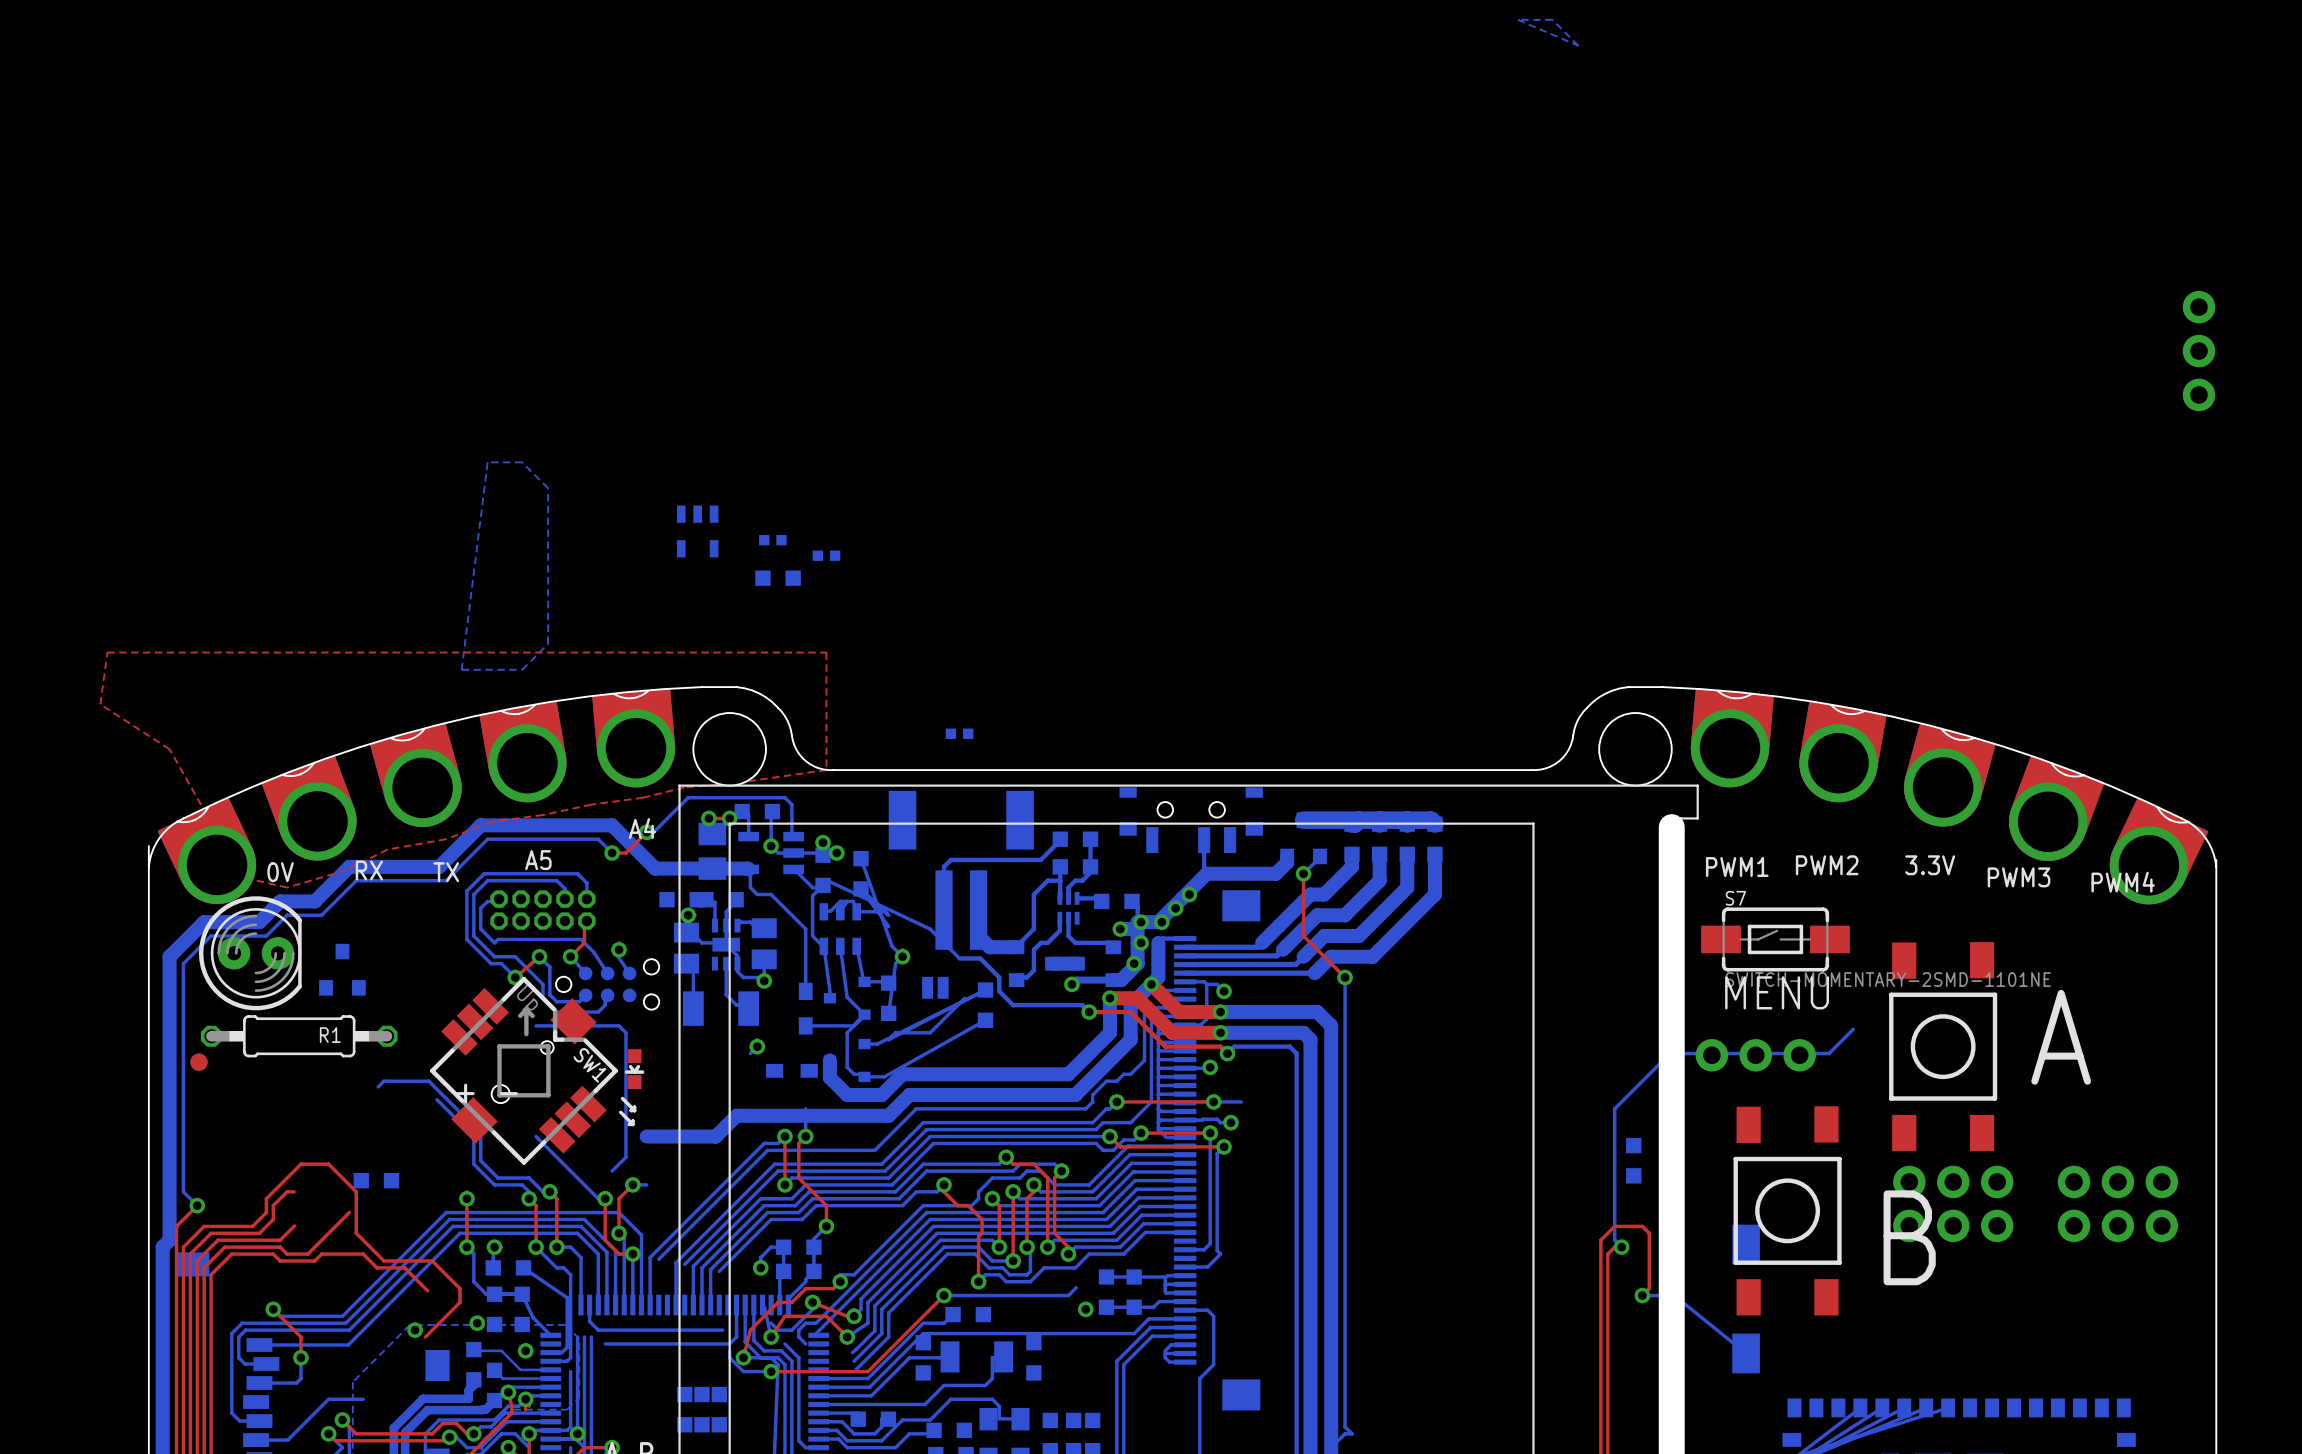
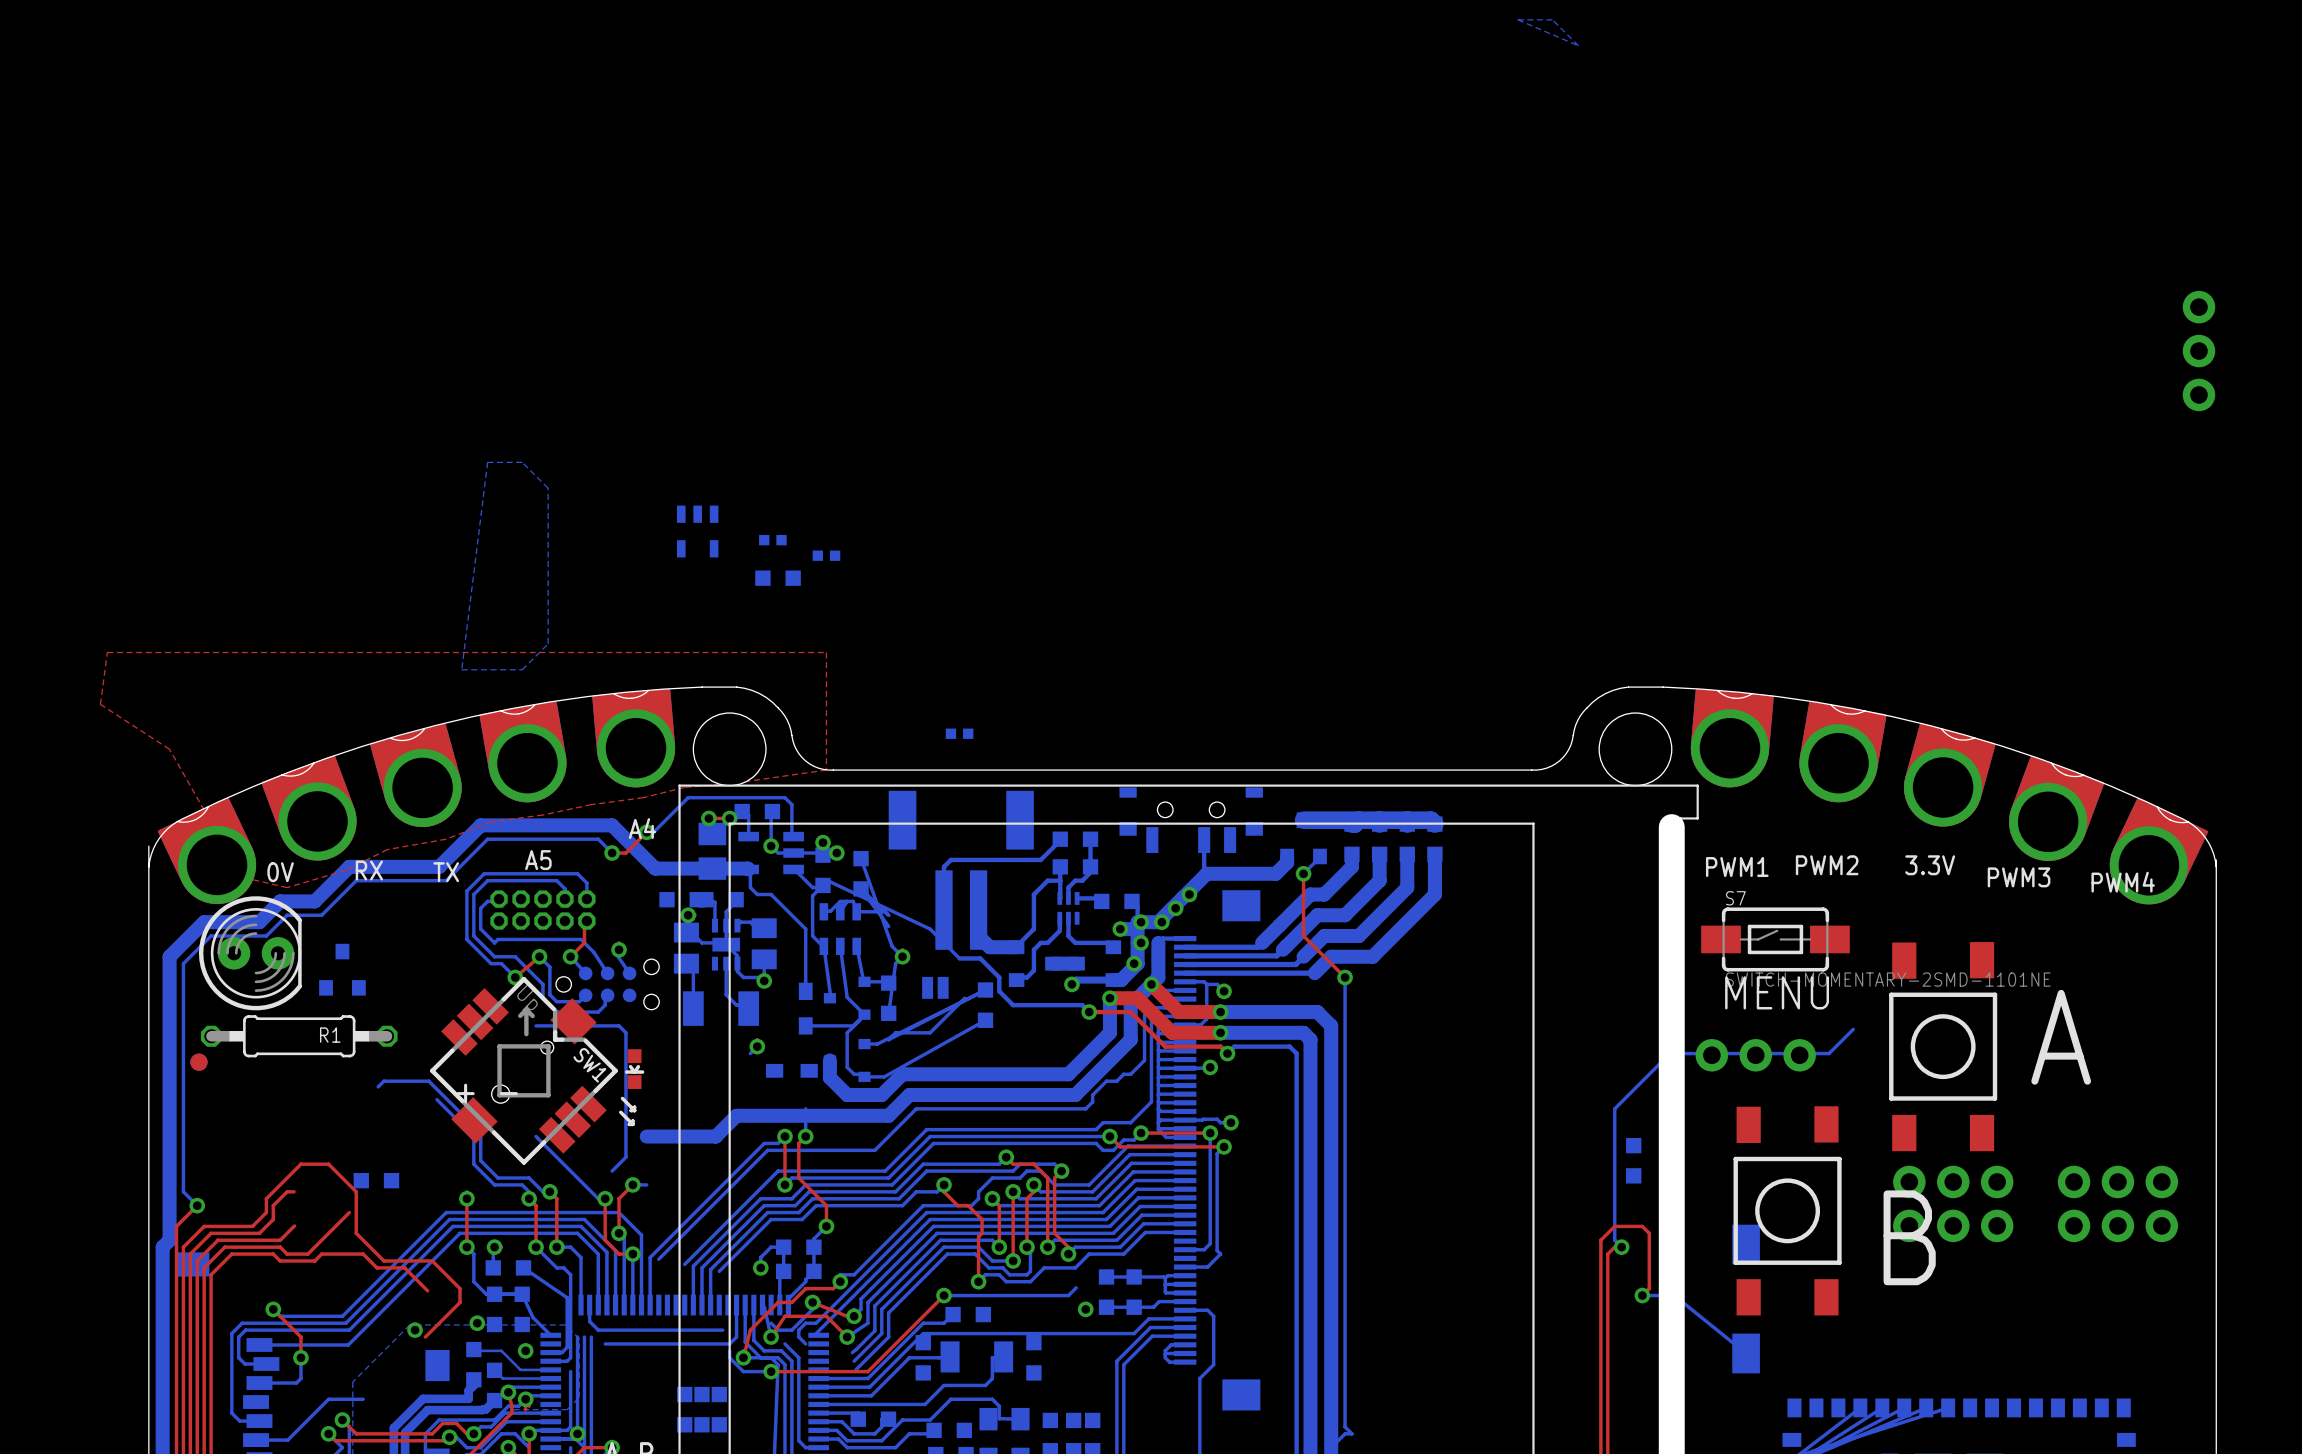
bottom track: (1116, 1101) (1092, 1122) (923, 1122) (881, 1164) (774, 1164) (676, 1262) (676, 1305) -> none
top track: (1116, 1101) (1213, 1101) -> none
via: (1116, 1101) -> none
bottom track: (1213, 1101) (1241, 1101) -> none
via: (1213, 1101) -> none

